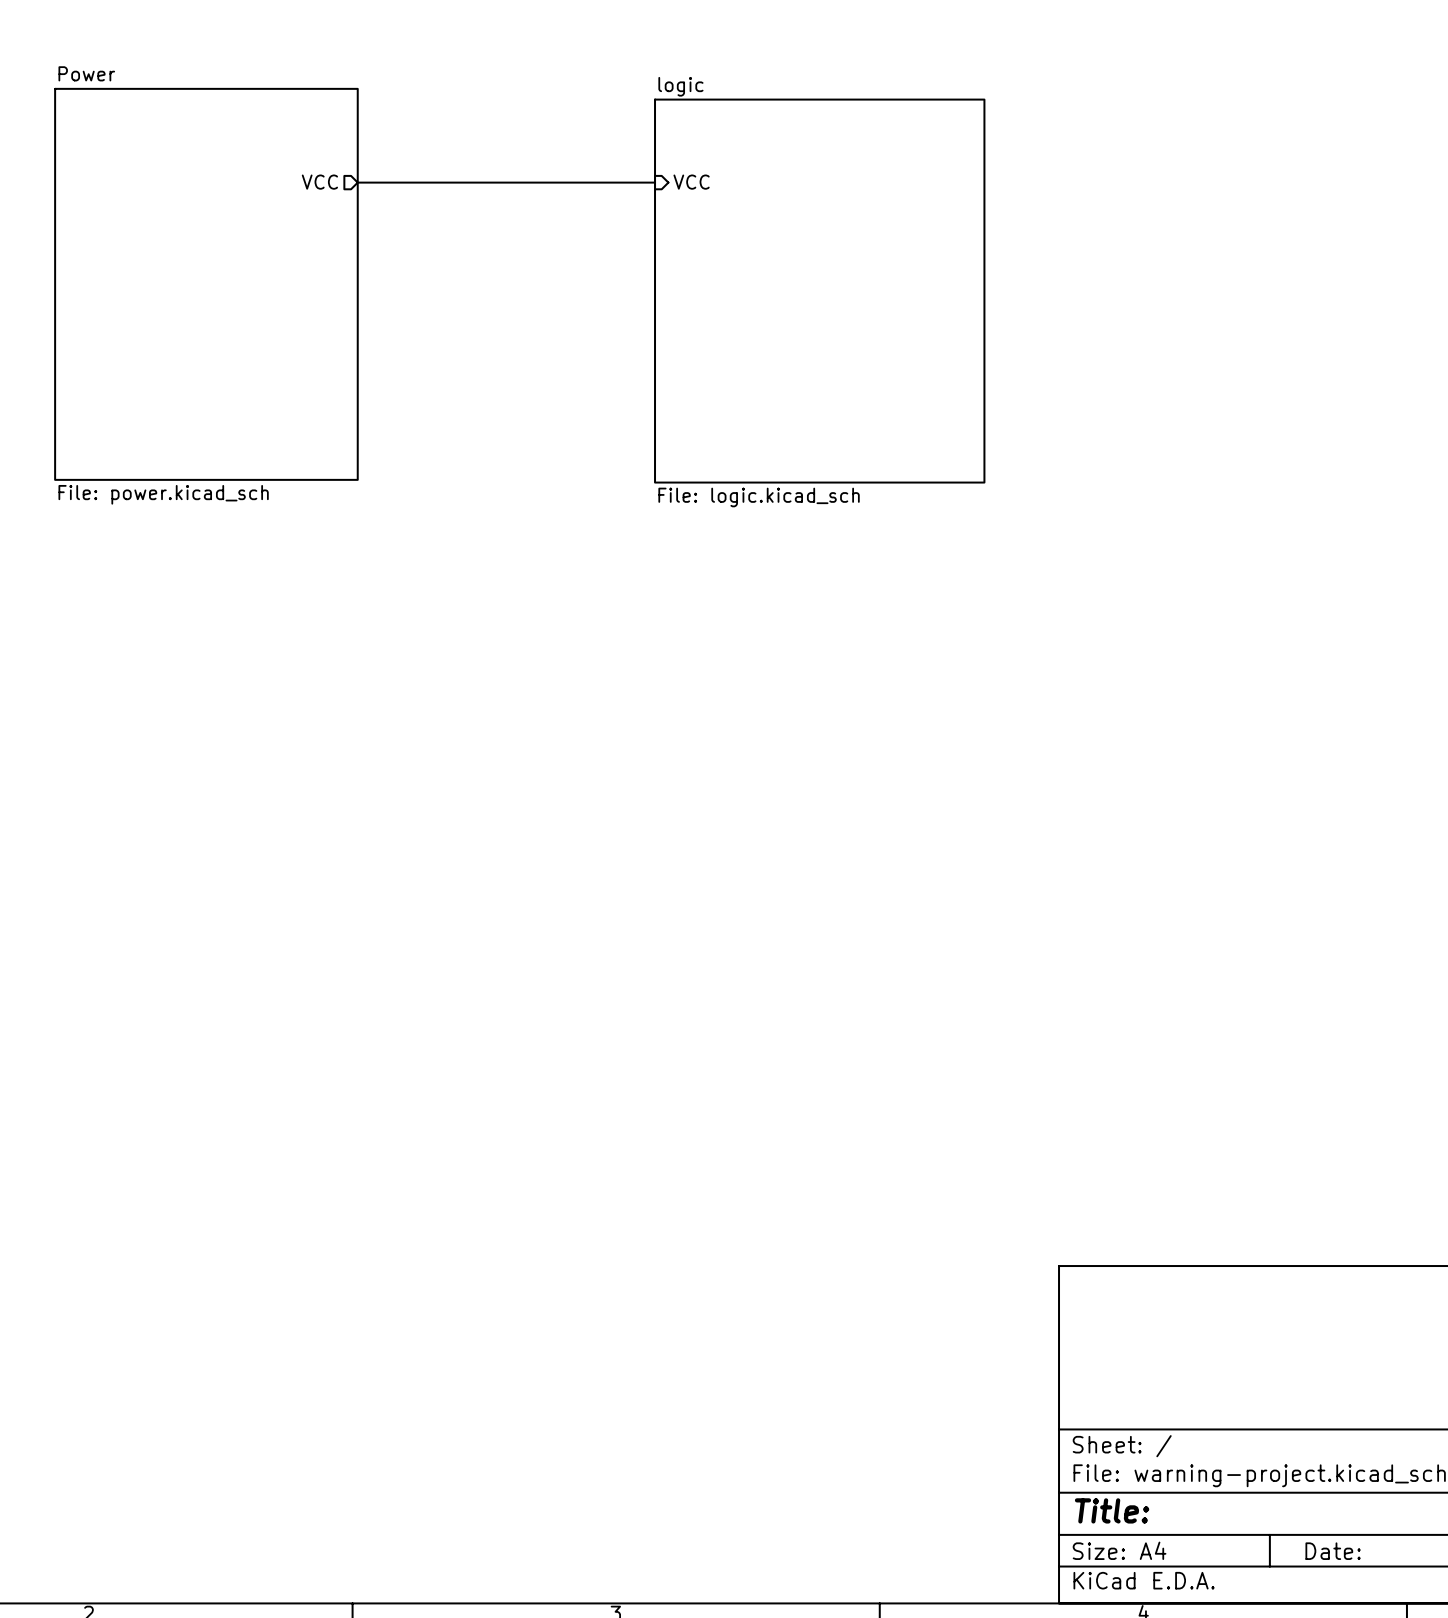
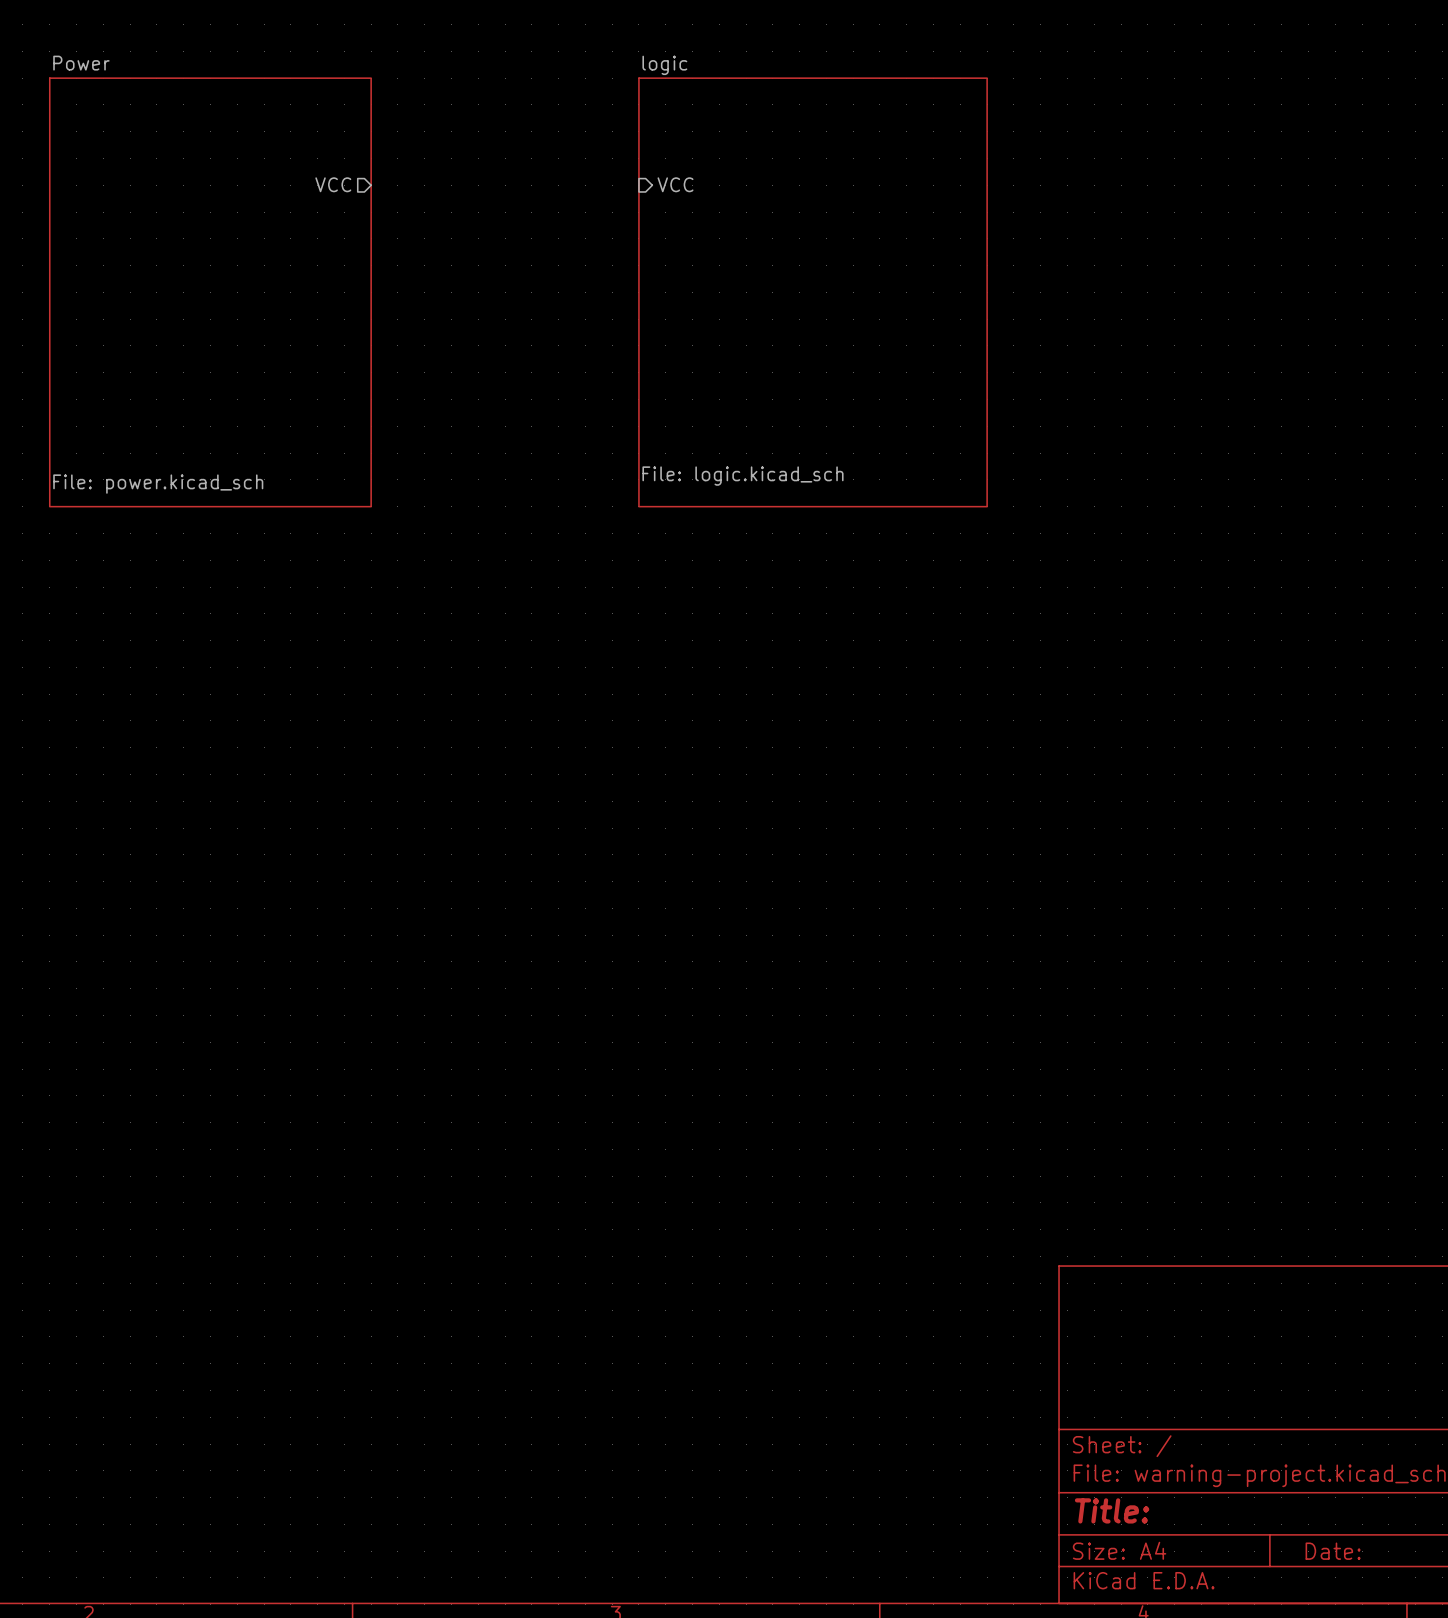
sheet logic name position: logic (680, 86) -> logic (664, 65)
sheet Power shape: [55, 88, 358, 480] -> [49, 78, 372, 507]
sheet logic shape: [655, 99, 985, 483] -> [638, 78, 988, 507]
sheet pin position: VCC (319, 182) -> VCC (333, 184)
wire: (357, 182) (655, 182) -> none
sheet pin position: VCC (691, 182) -> VCC (675, 184)
sheet logic value position: File: logic.kicad_sch (759, 497) -> File: logic.kicad_sch (742, 476)

